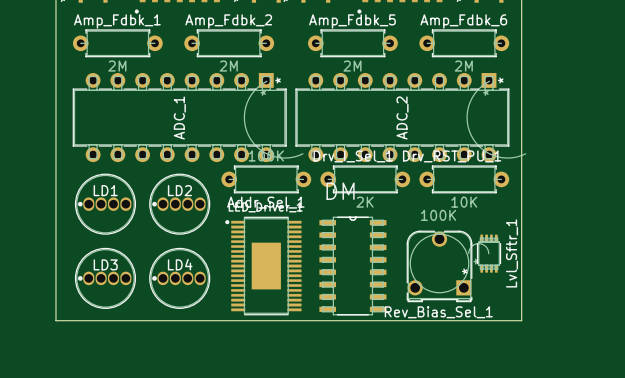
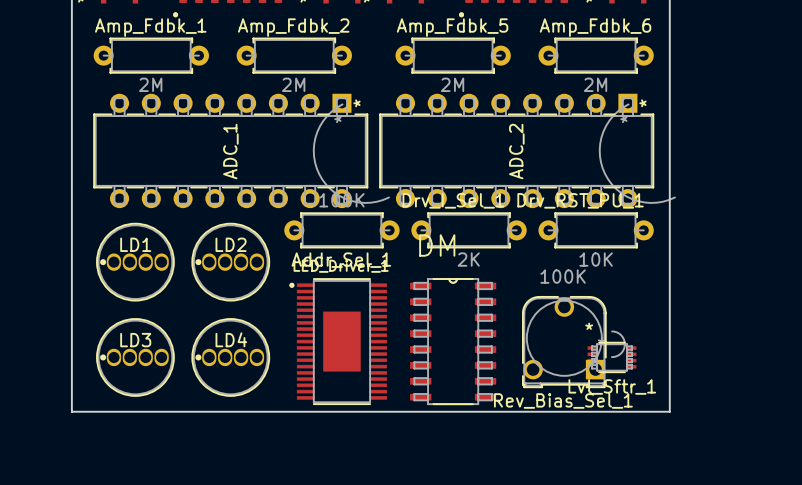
Lvl_Sftr_1 rotation: 0° (484, 253) -> 90° clockwise (612, 351)

